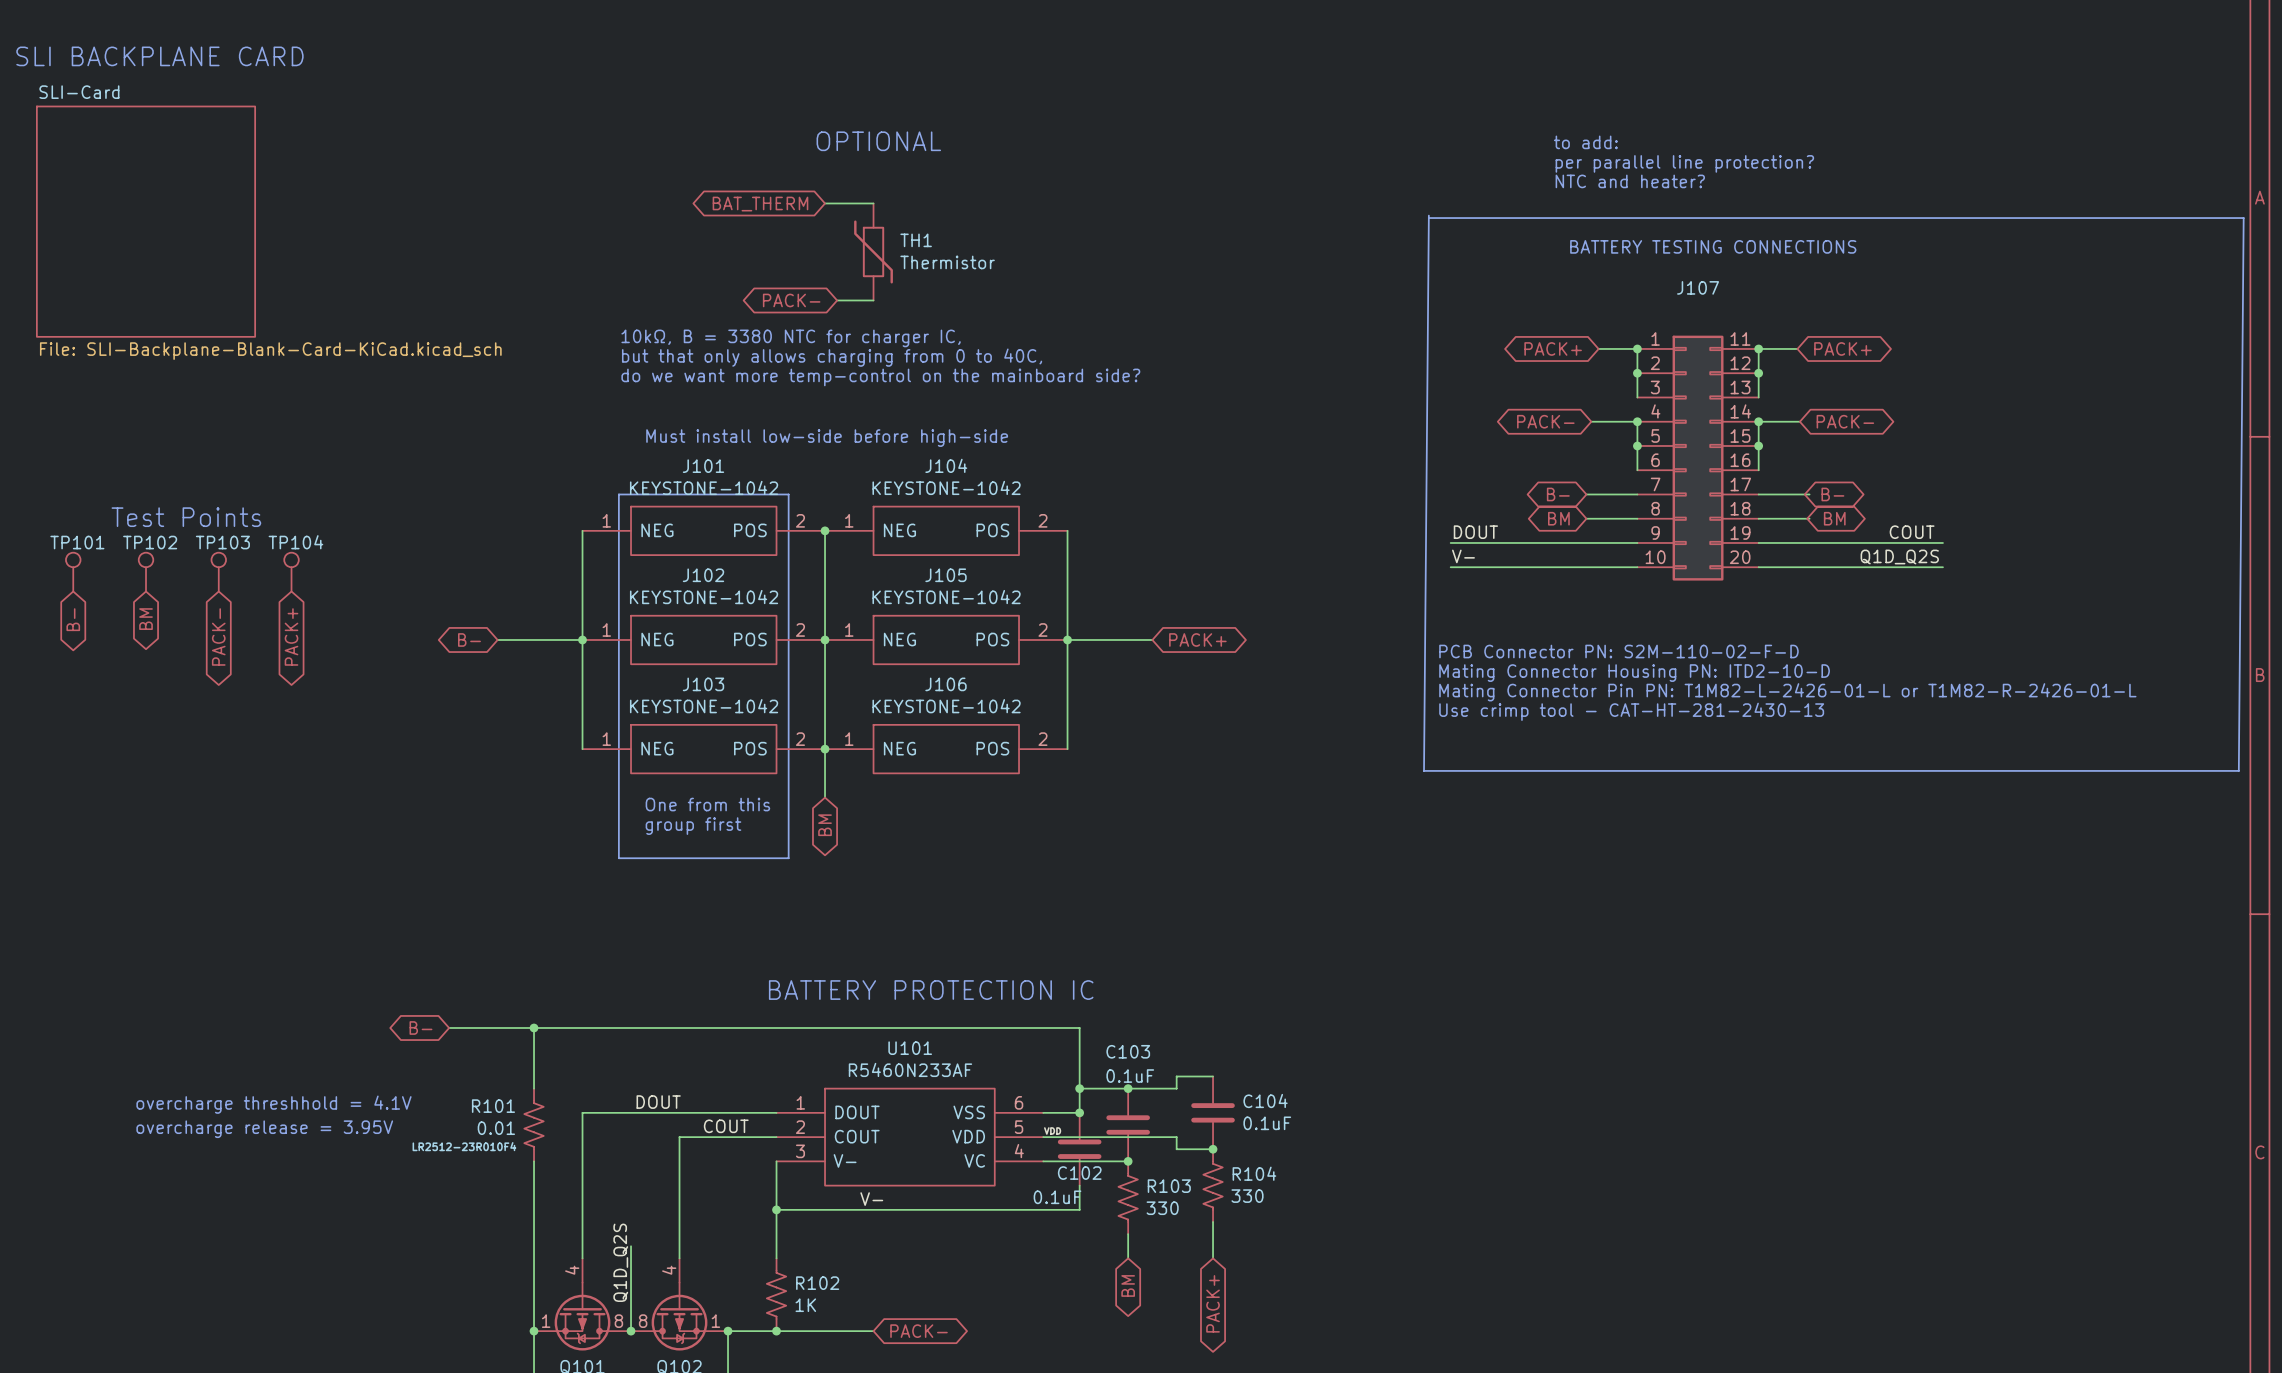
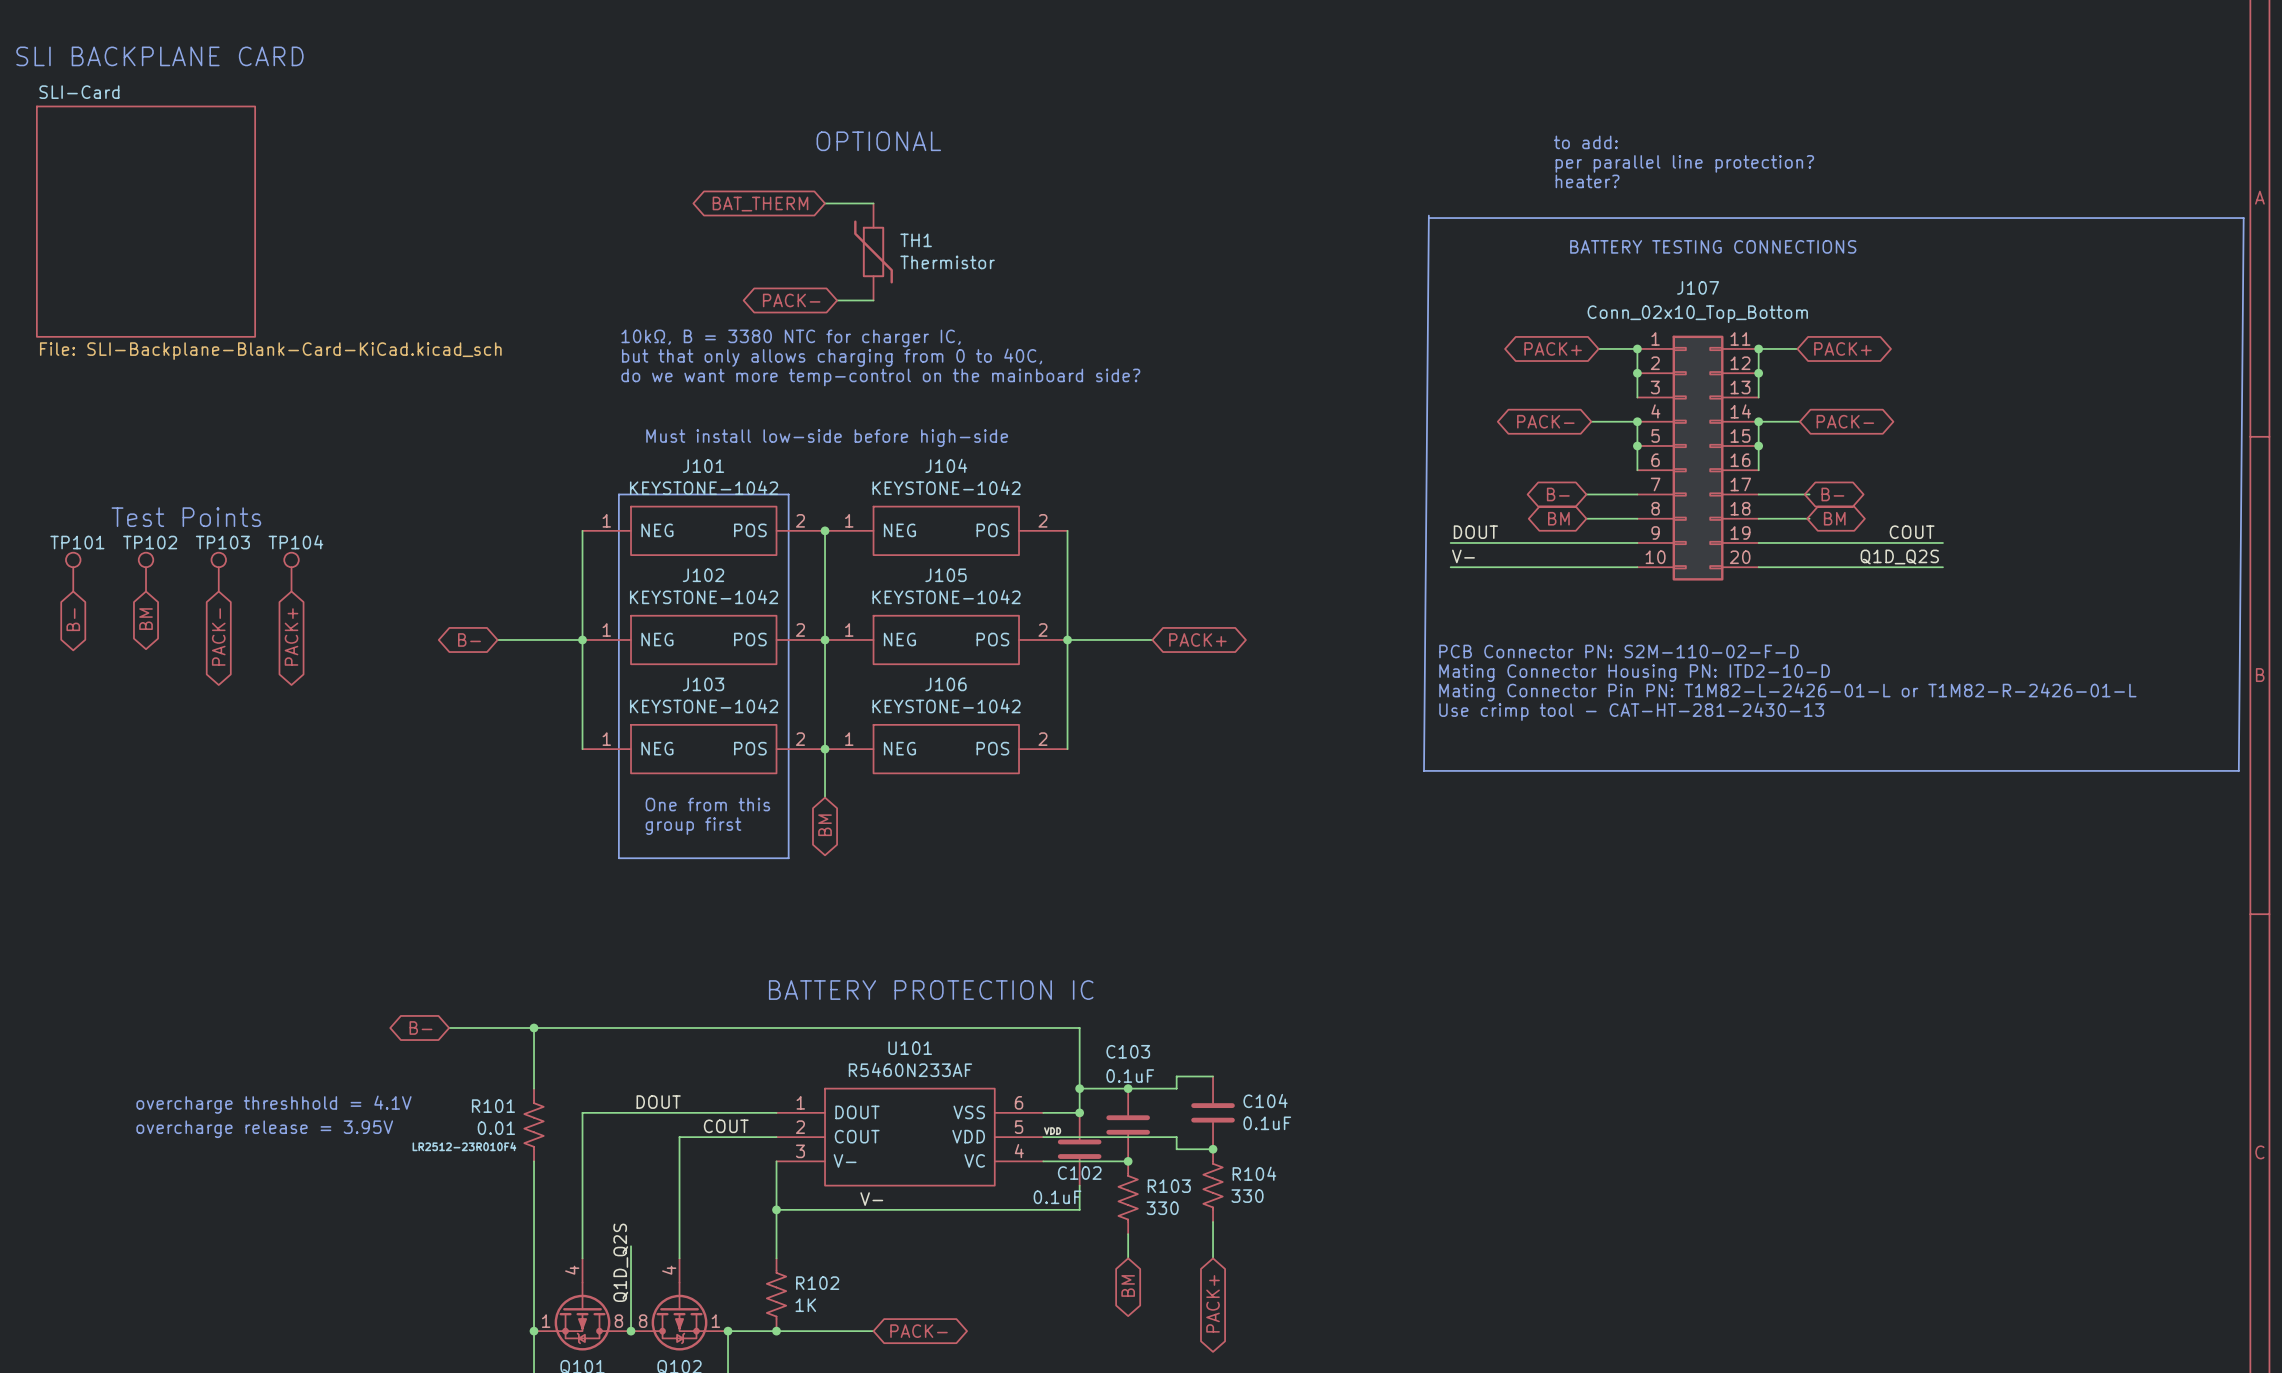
text: NTC and heater? (1630, 181) -> heater? (1587, 181)
J107 value: none -> Conn_02x10_Top_Bottom (1697, 314)

